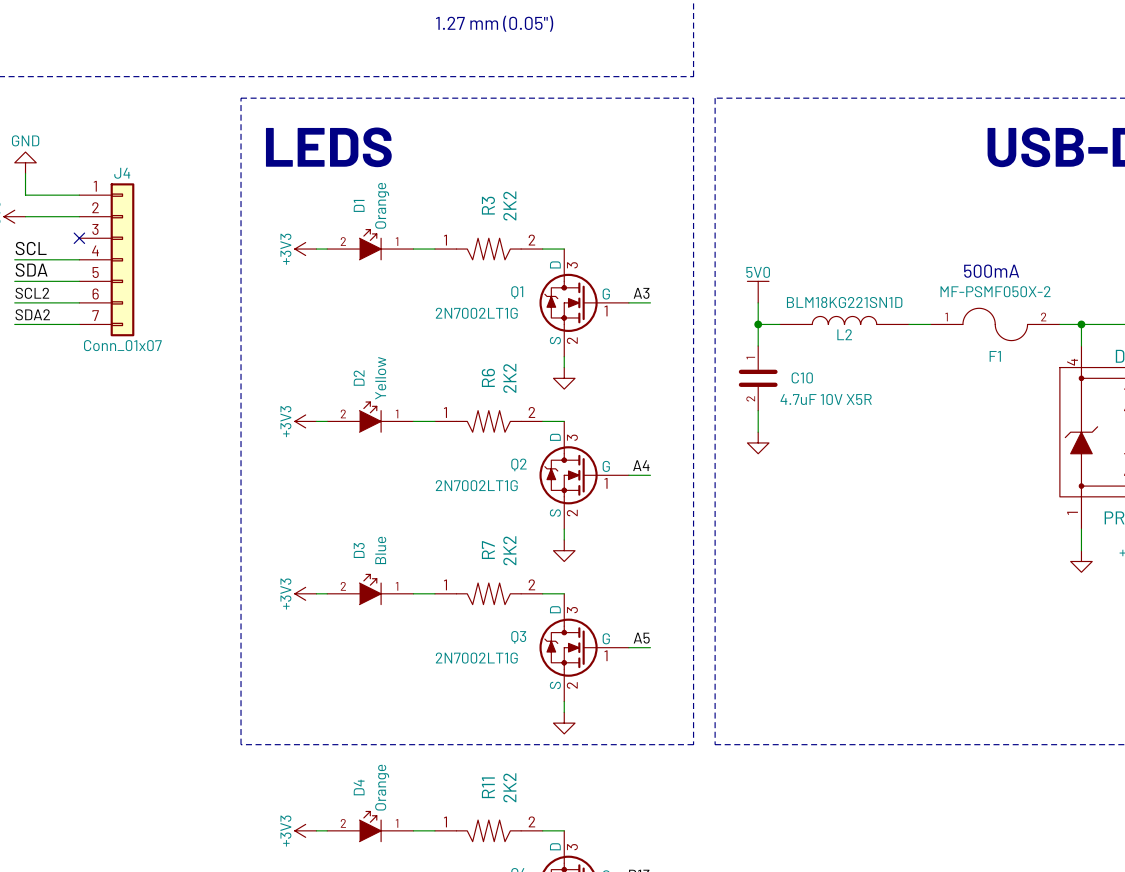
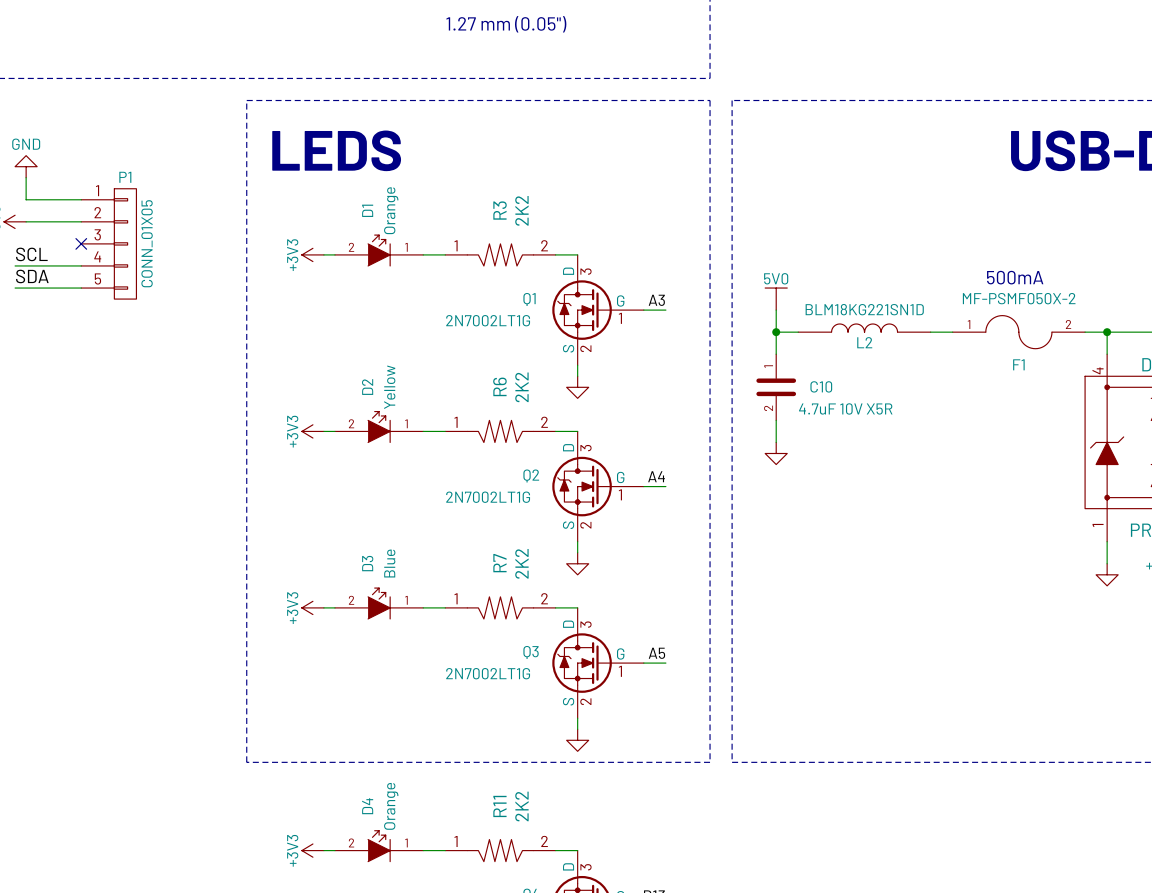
P1: none -> CONN_01X05 (108, 243)
J4: Conn_01x07 (106, 259) -> none
label: SCL2 (32, 293) -> none
wire: (14, 302) (79, 302) -> none
label: SDA2 (32, 314) -> none
wire: (14, 324) (79, 324) -> none

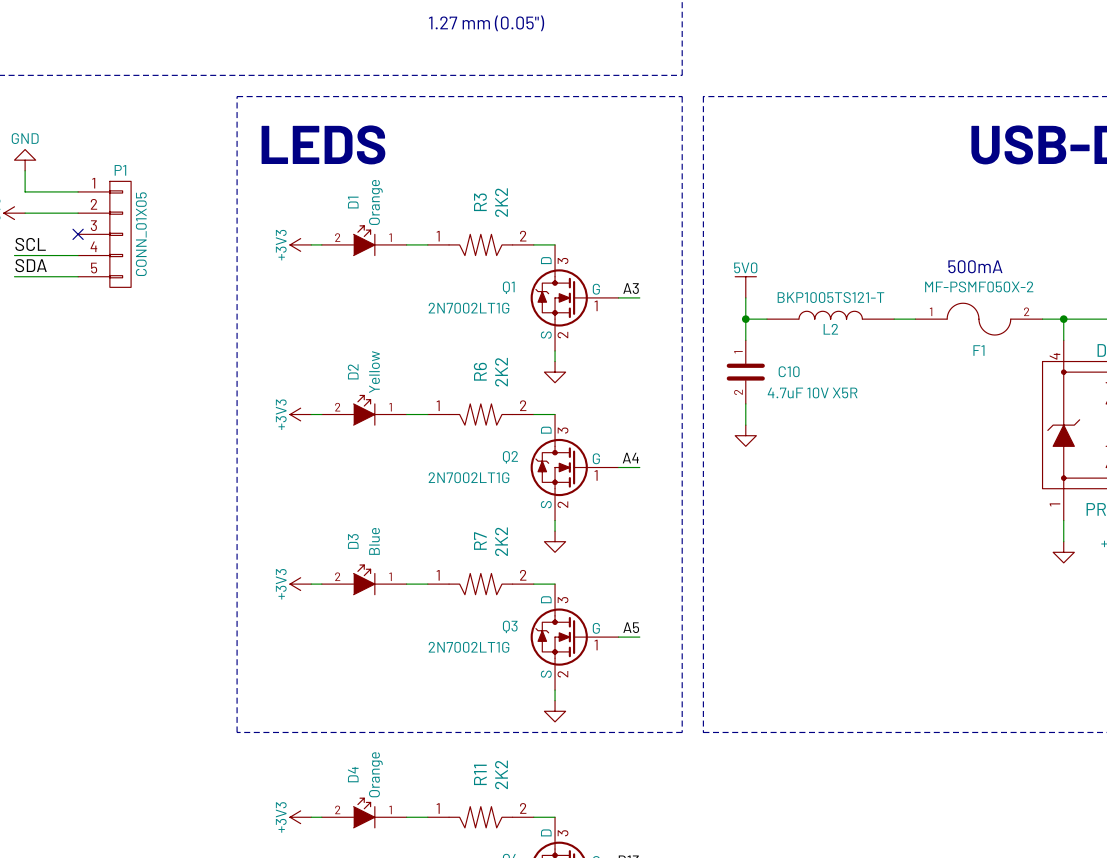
L2 value: BLM18KG221SN1D (864, 309) -> BKP1005TS121-T (830, 297)

